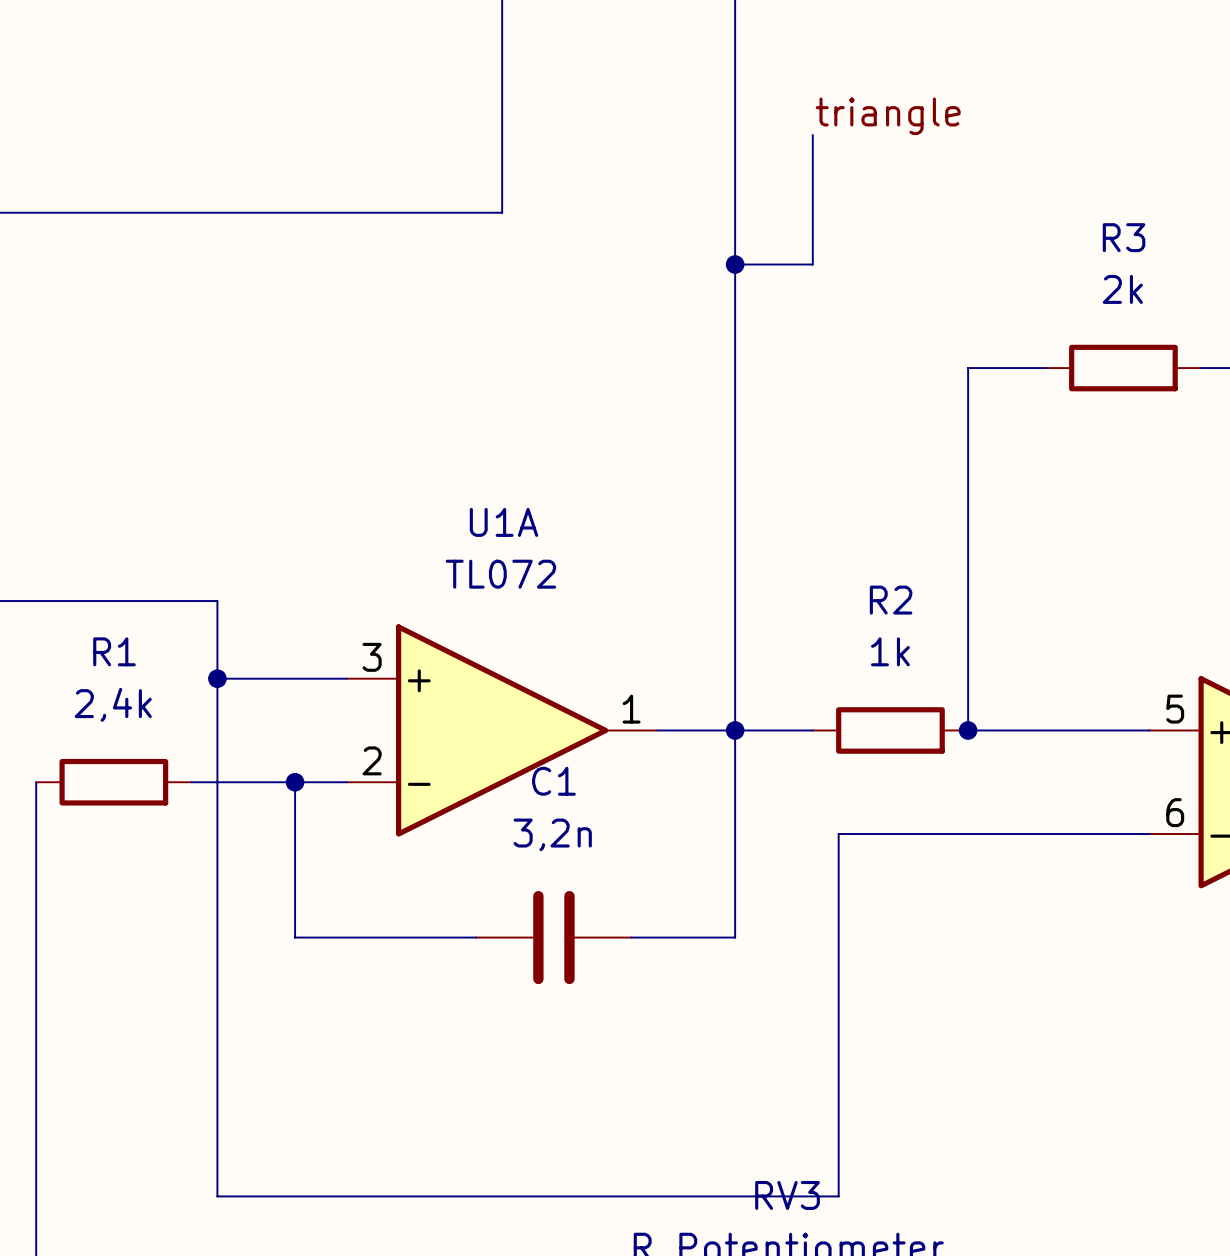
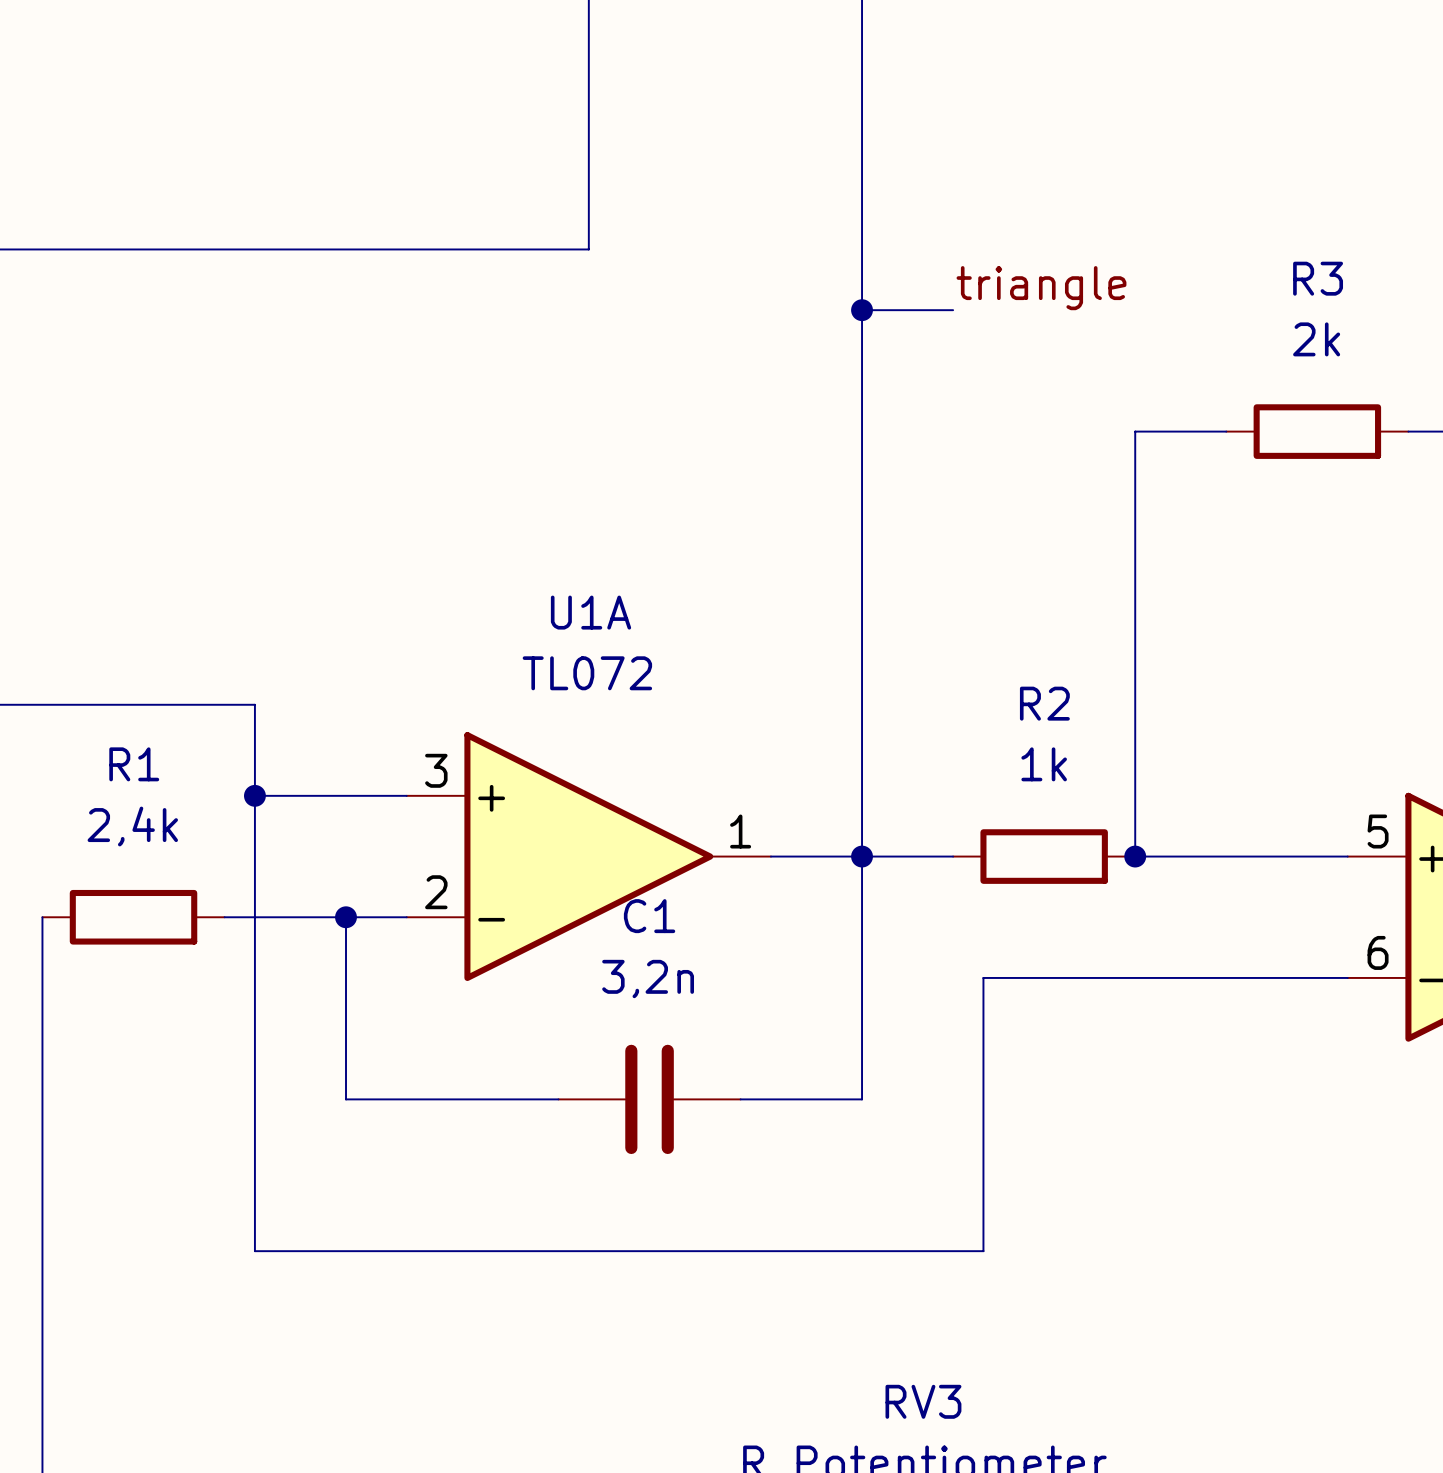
label position: triangle (888, 116) -> triangle (1041, 288)
wire: (812, 135) (812, 264) -> none
wire: (217, 1066) (217, 1196) (838, 1196) (838, 1066) -> (254, 1251) (983, 1251)

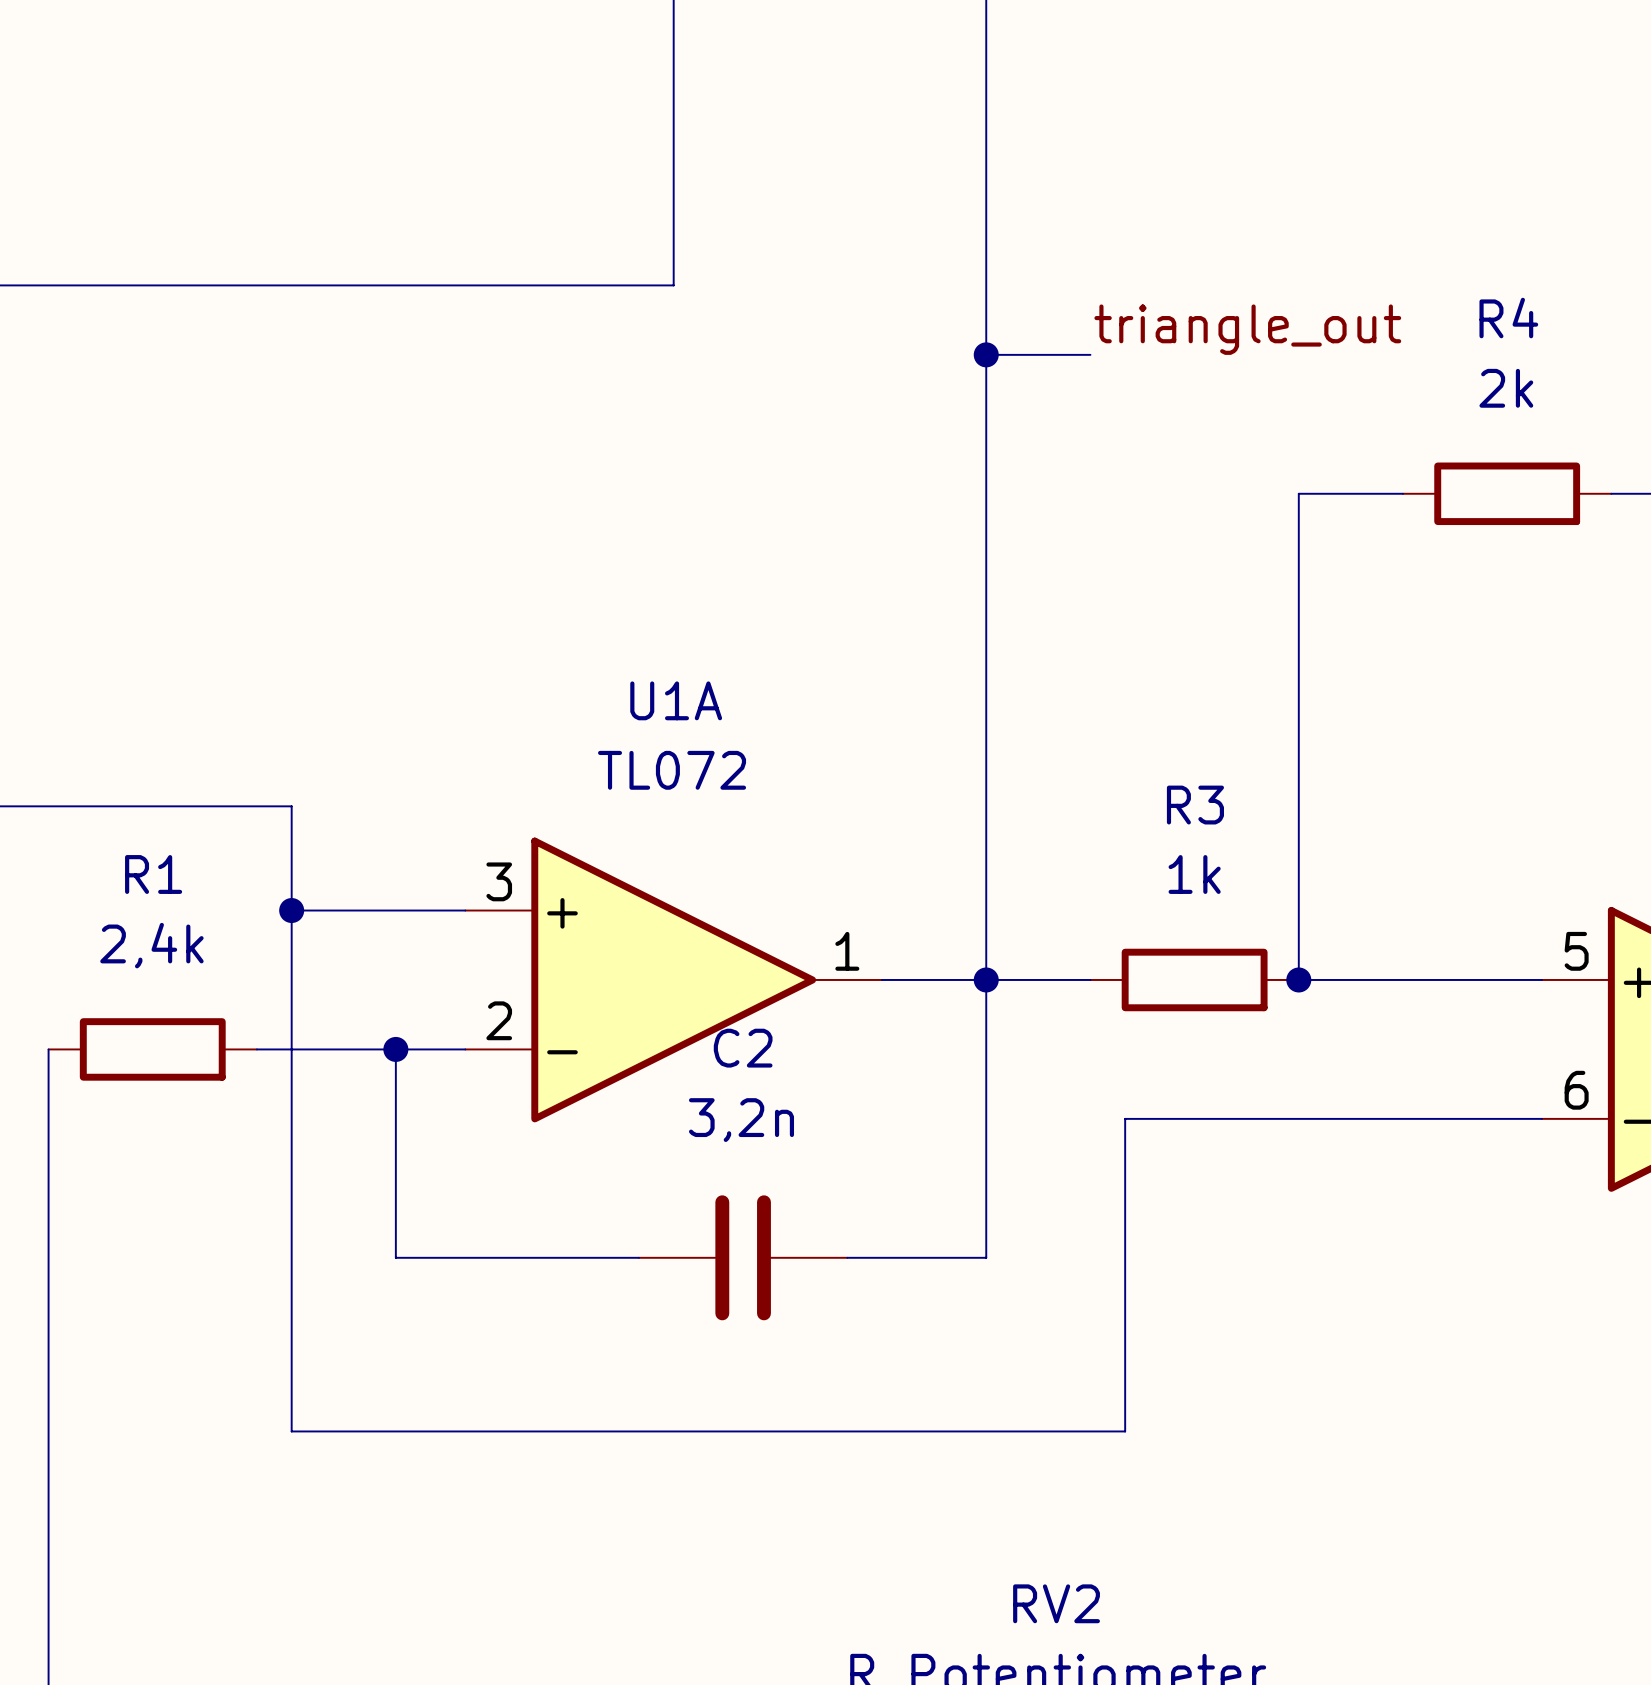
R3 name: R3 (1318, 278) -> R4 (1508, 318)
label: triangle (1041, 288) -> triangle_out (1247, 329)
R2 name: R2 (1044, 703) -> R3 (1195, 805)
C1 name: C1 (649, 916) -> C2 (743, 1048)
RV3 name: RV3 (923, 1401) -> RV2 (1056, 1603)

